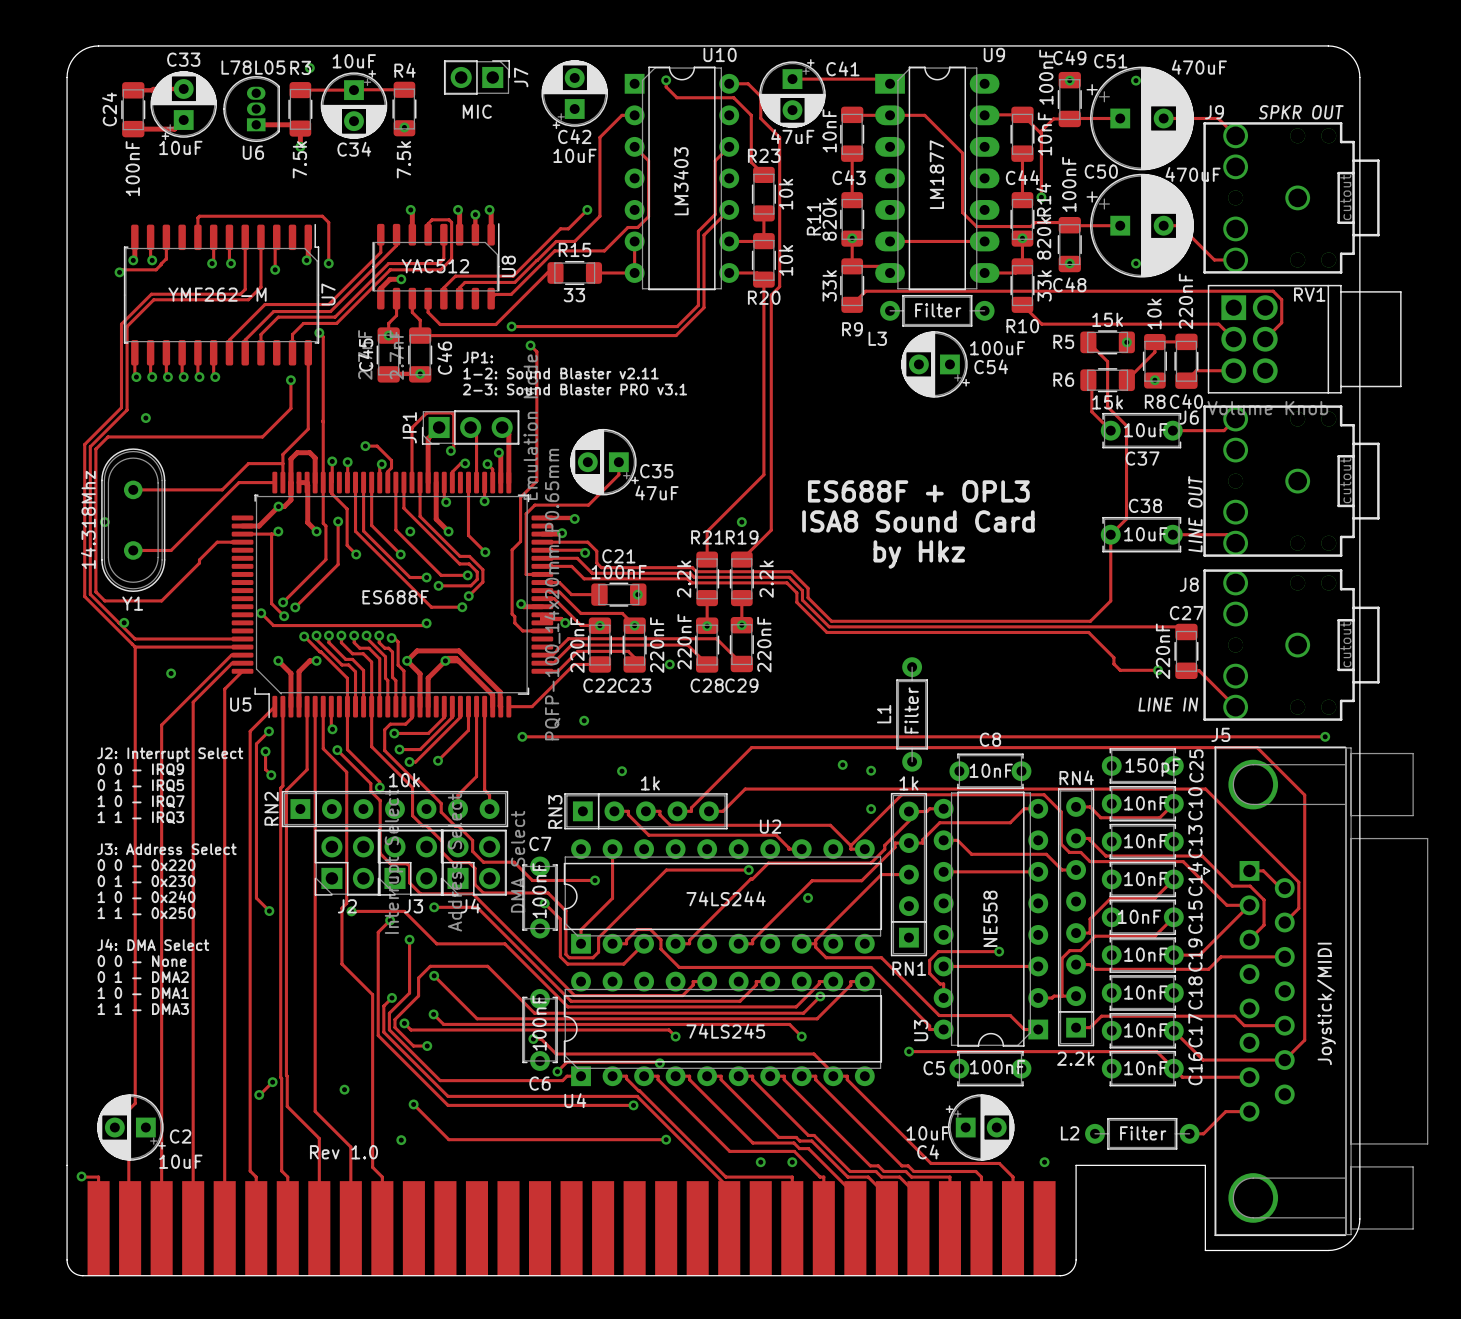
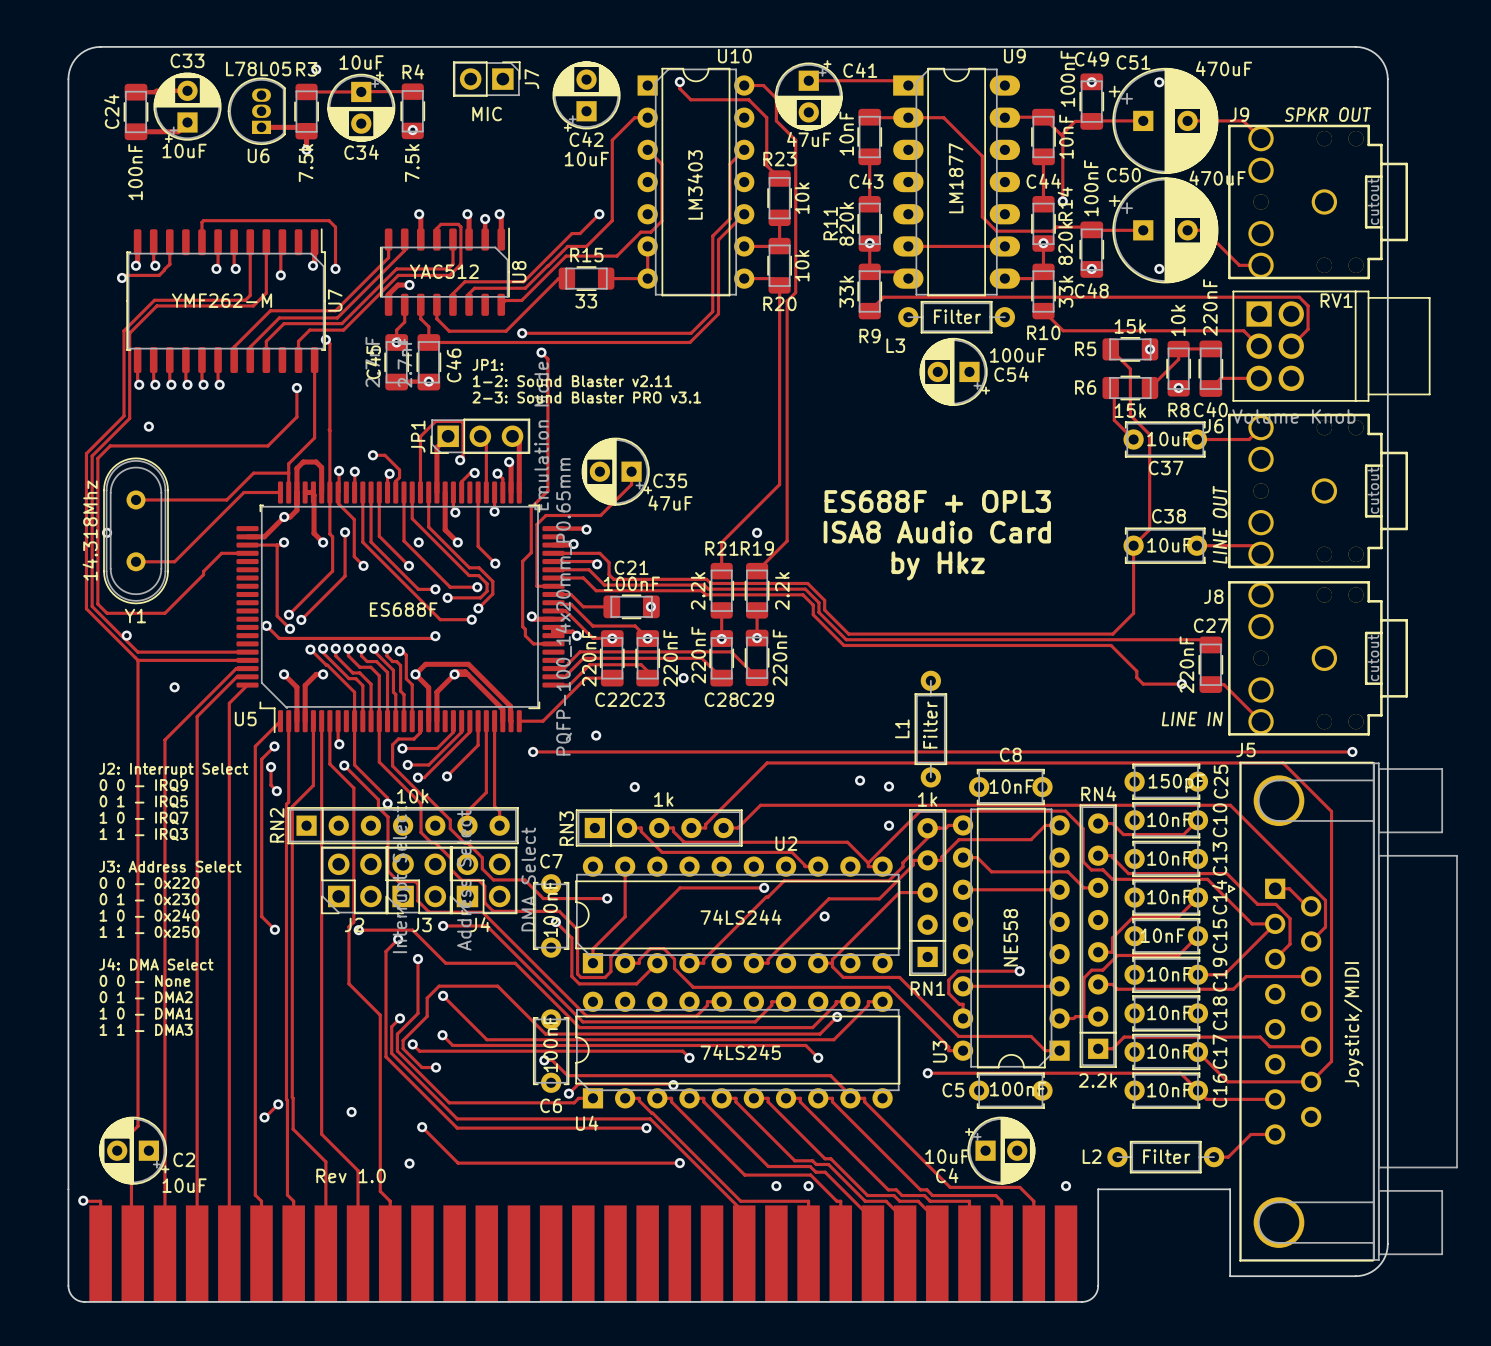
text: ISA8 Sound Card (918, 521) -> ISA8 Audio Card (937, 532)

